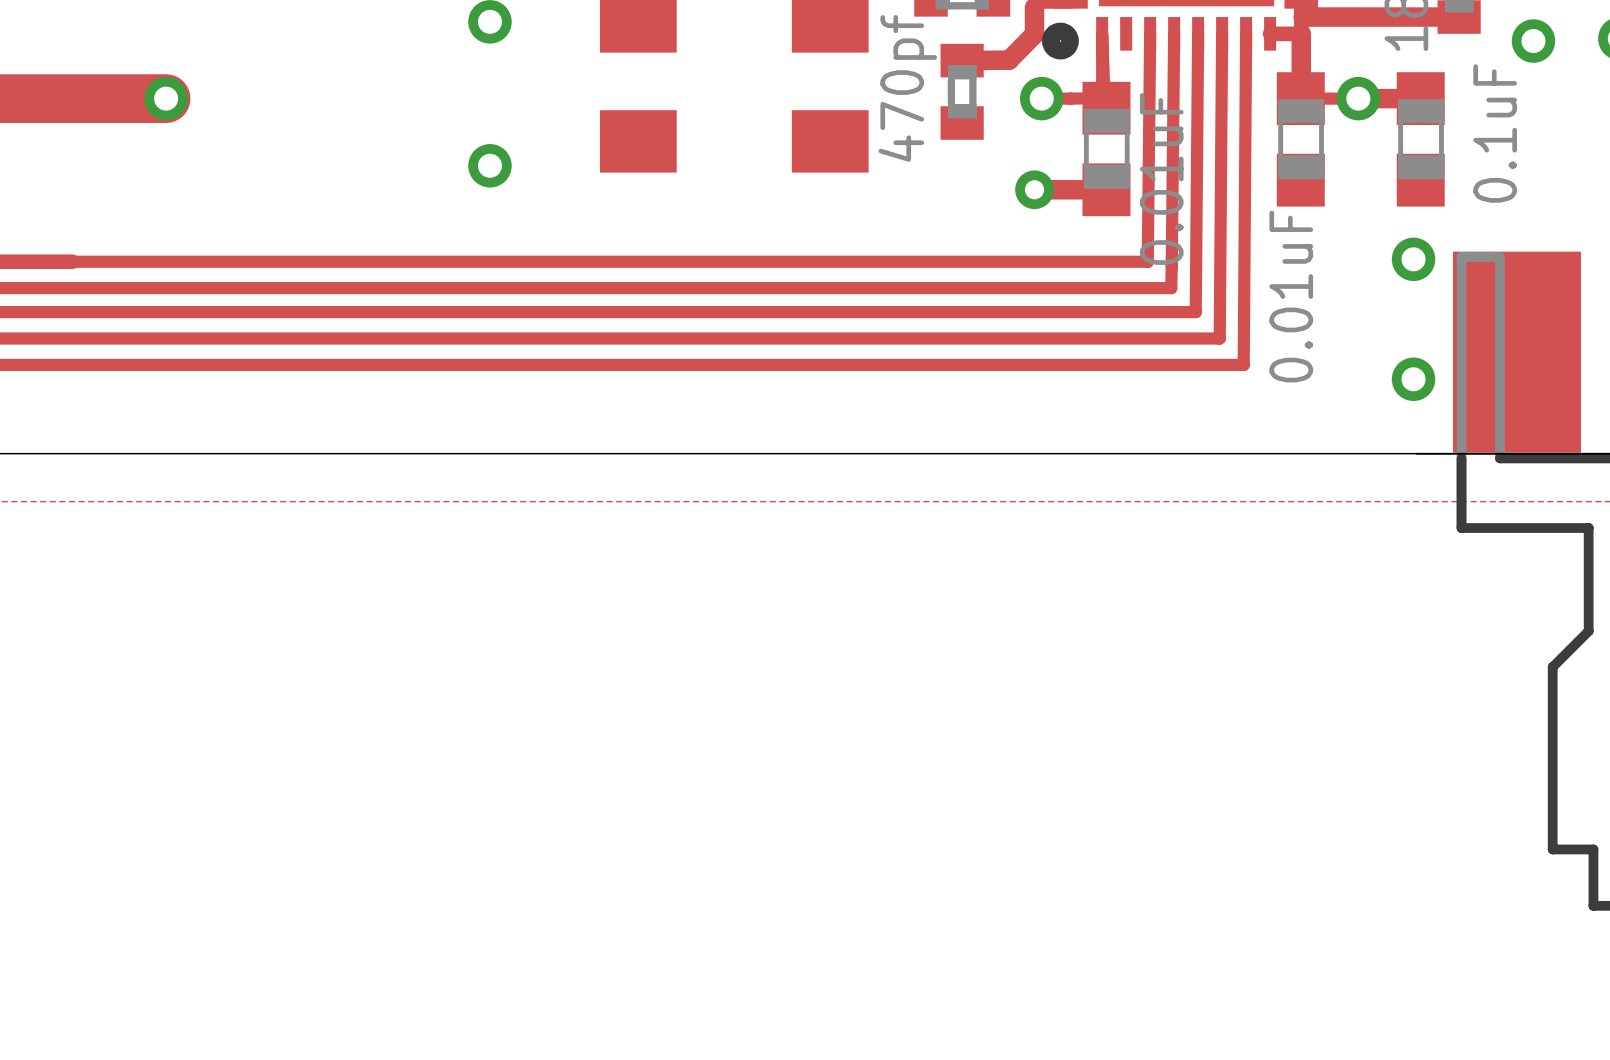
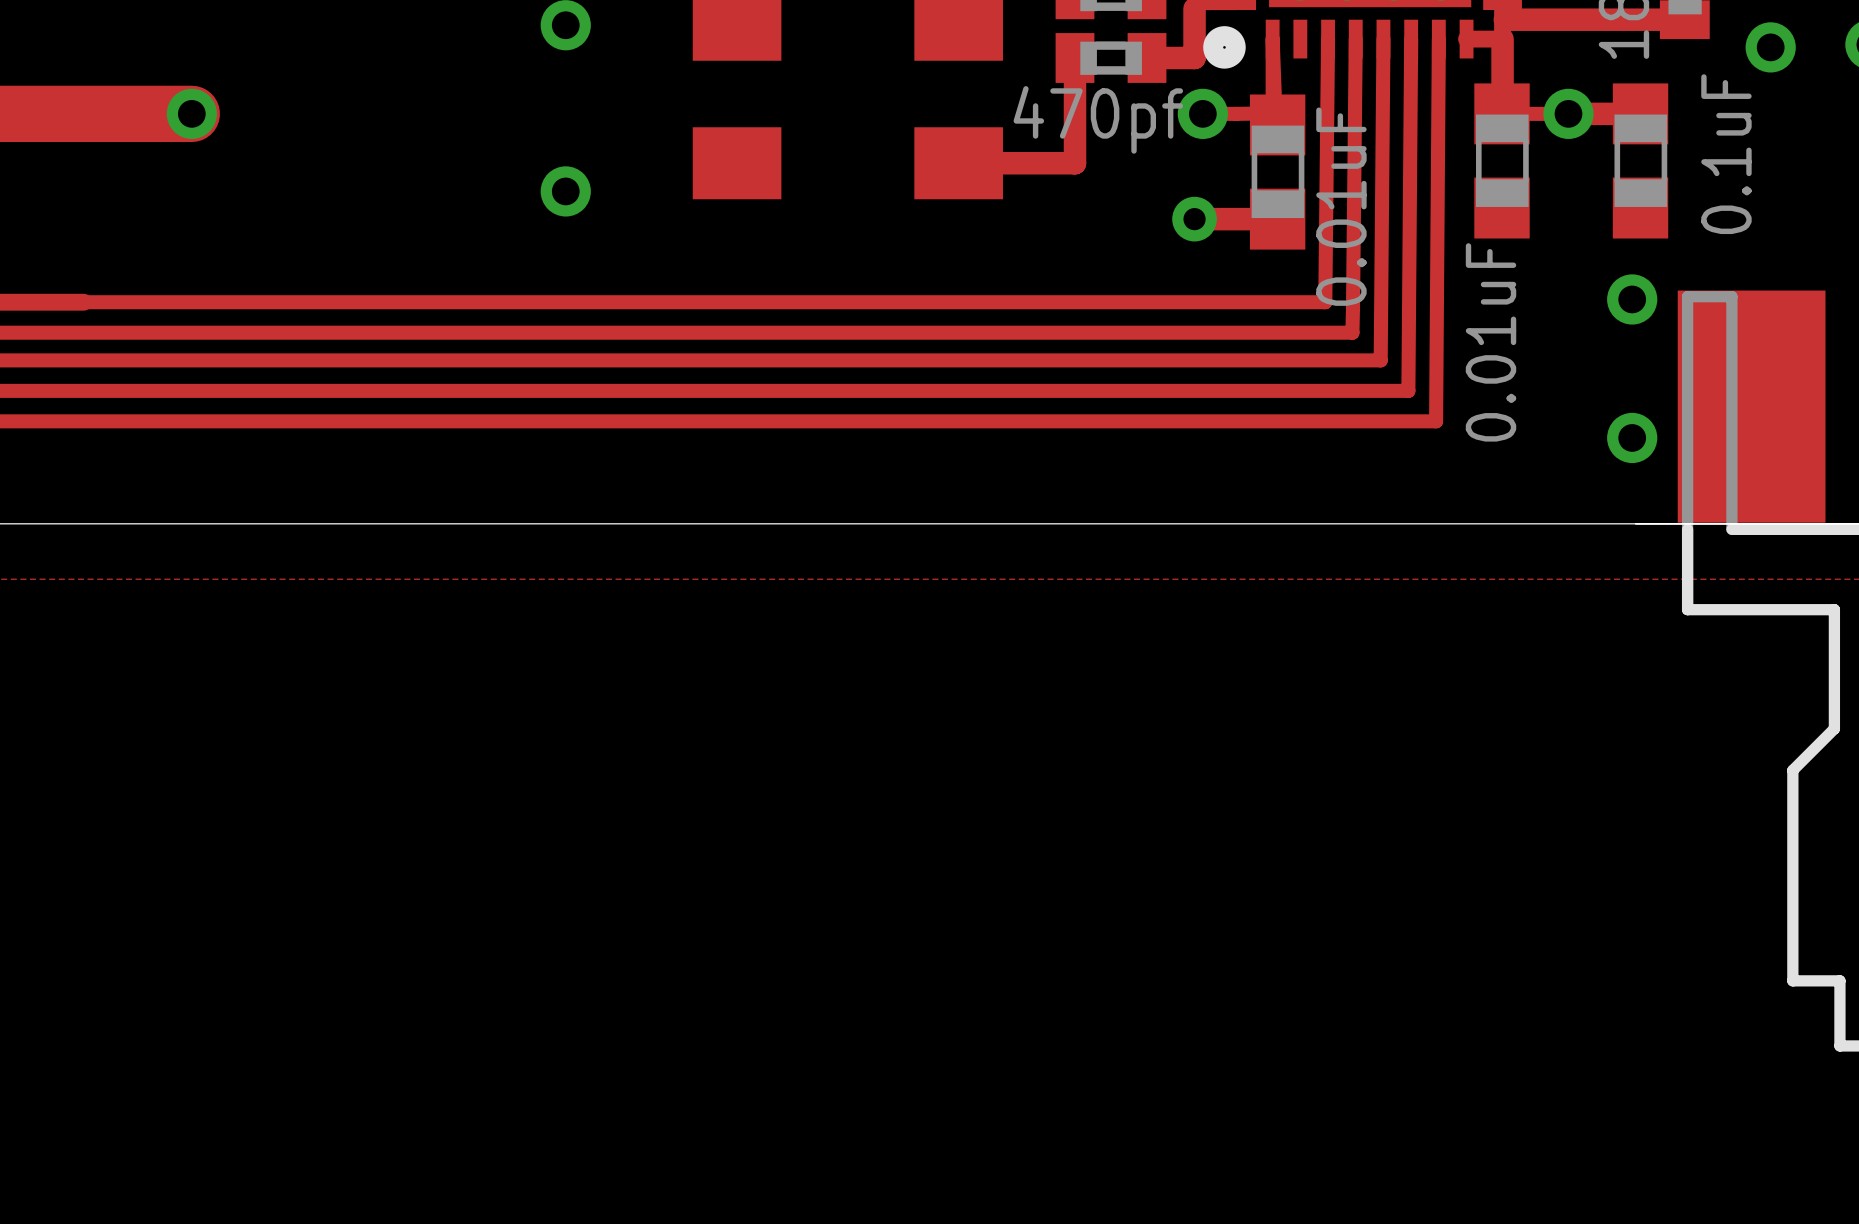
track: (1034, 34) (1009, 60) (962, 60) -> (1194, 39) (1194, 58) (1147, 58)
track: none -> (1075, 58) (1075, 163) (958, 163)
part value rotation: 0° (907, 88) -> 90° clockwise (1098, 119)
part rotation: 0° (962, 91) -> 90° clockwise (1111, 58)

